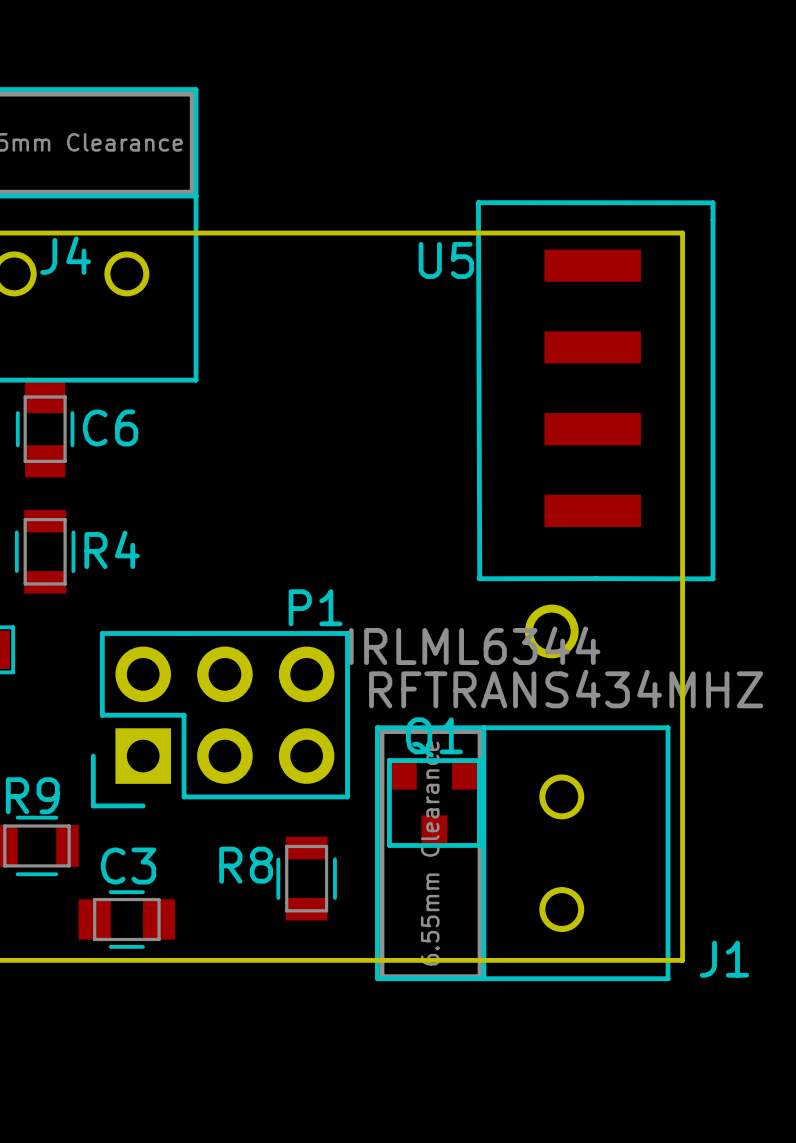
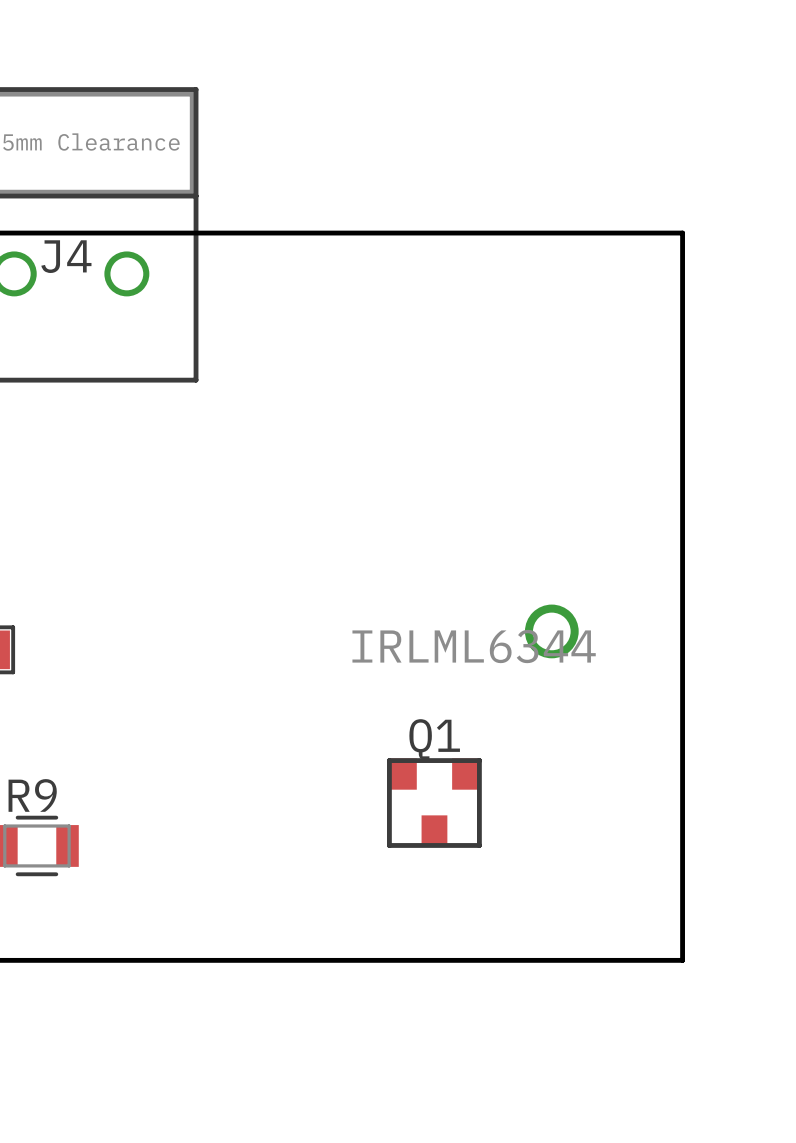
U5: RFTRANS434MHZ (595, 390) -> none
C6: (45, 429) -> none
R4: (45, 551) -> none
P1: (220, 719) -> none
J1: (522, 853) -> none
R8: (306, 878) -> none
C3: (126, 919) -> none

